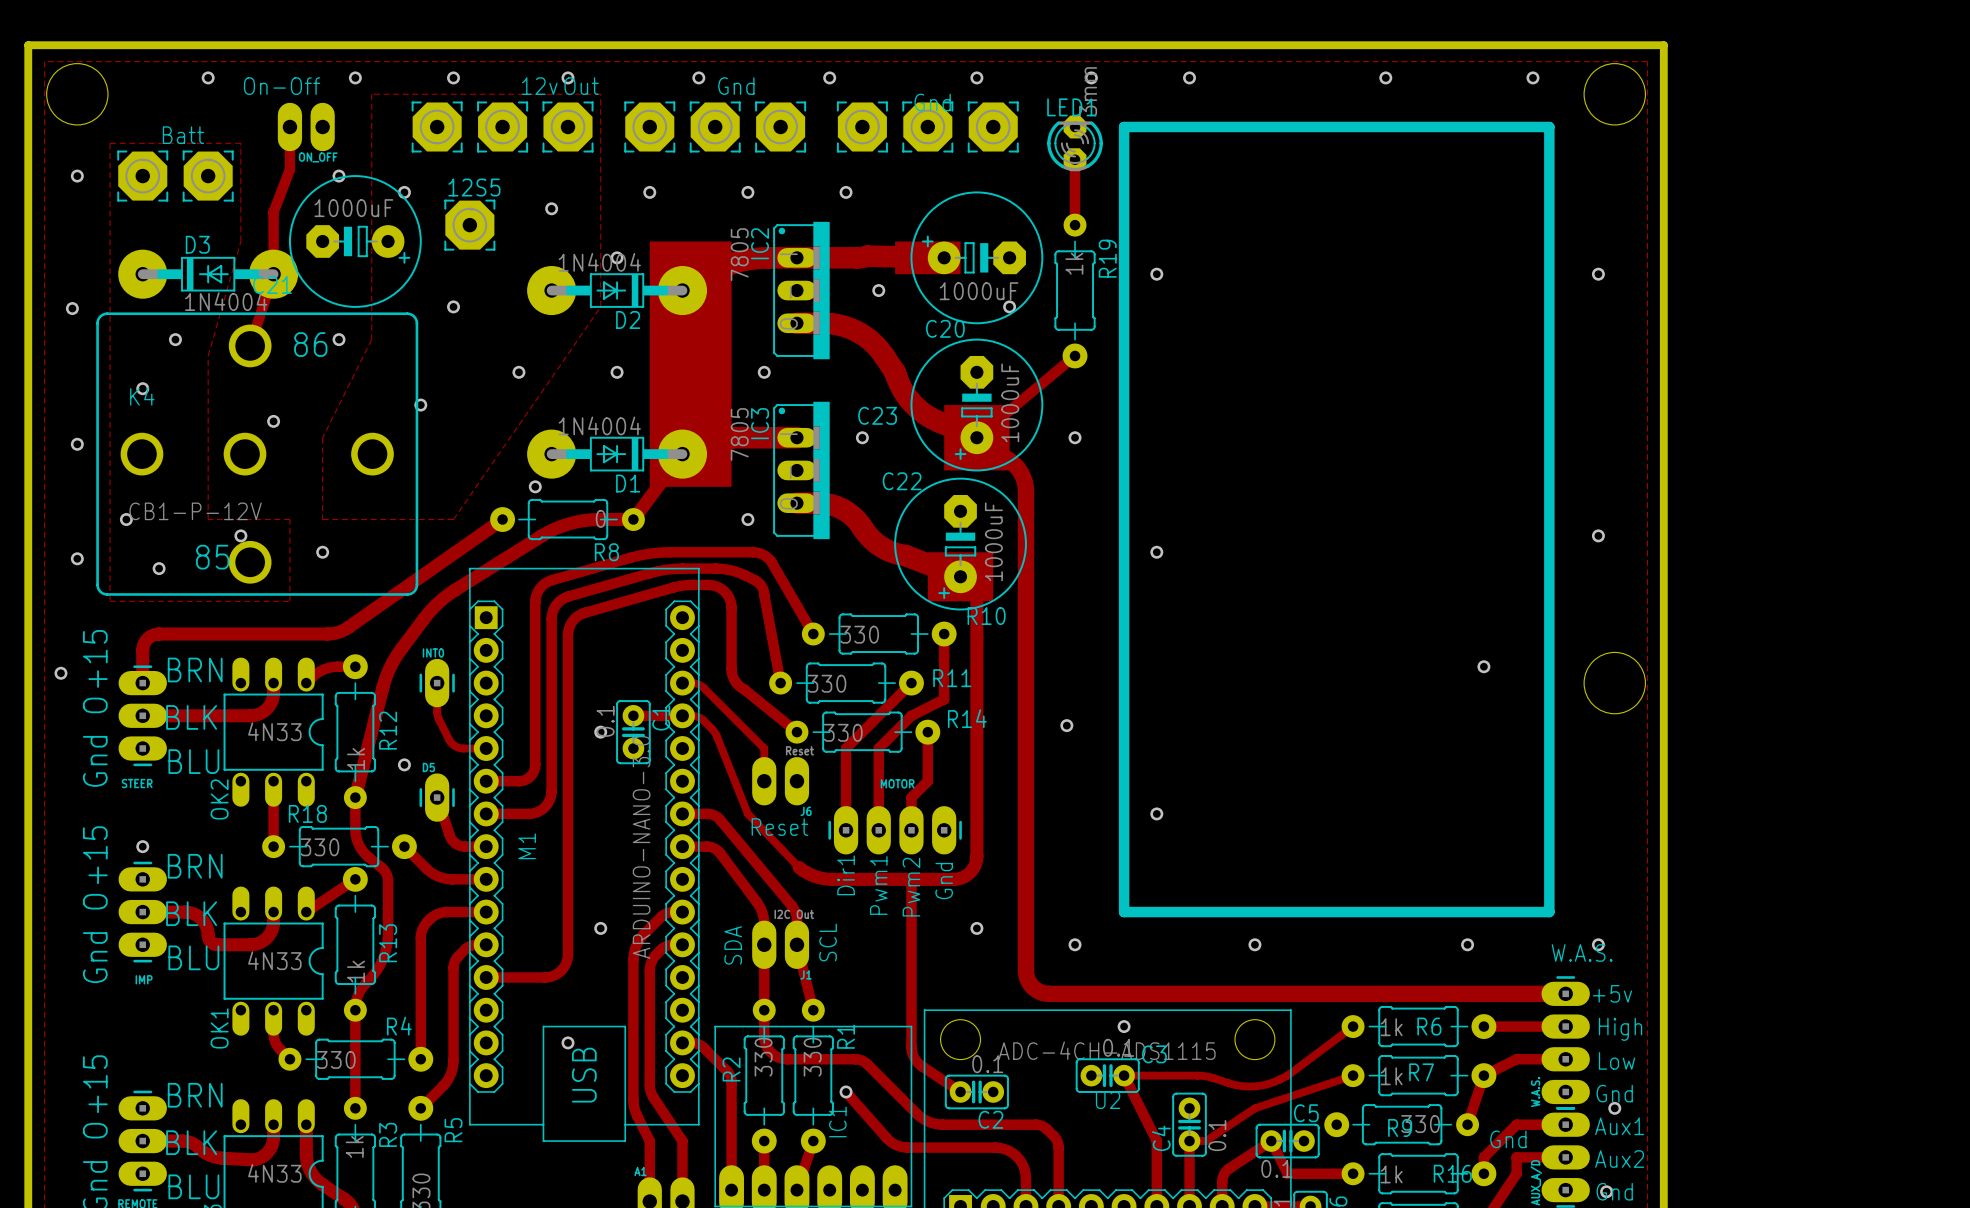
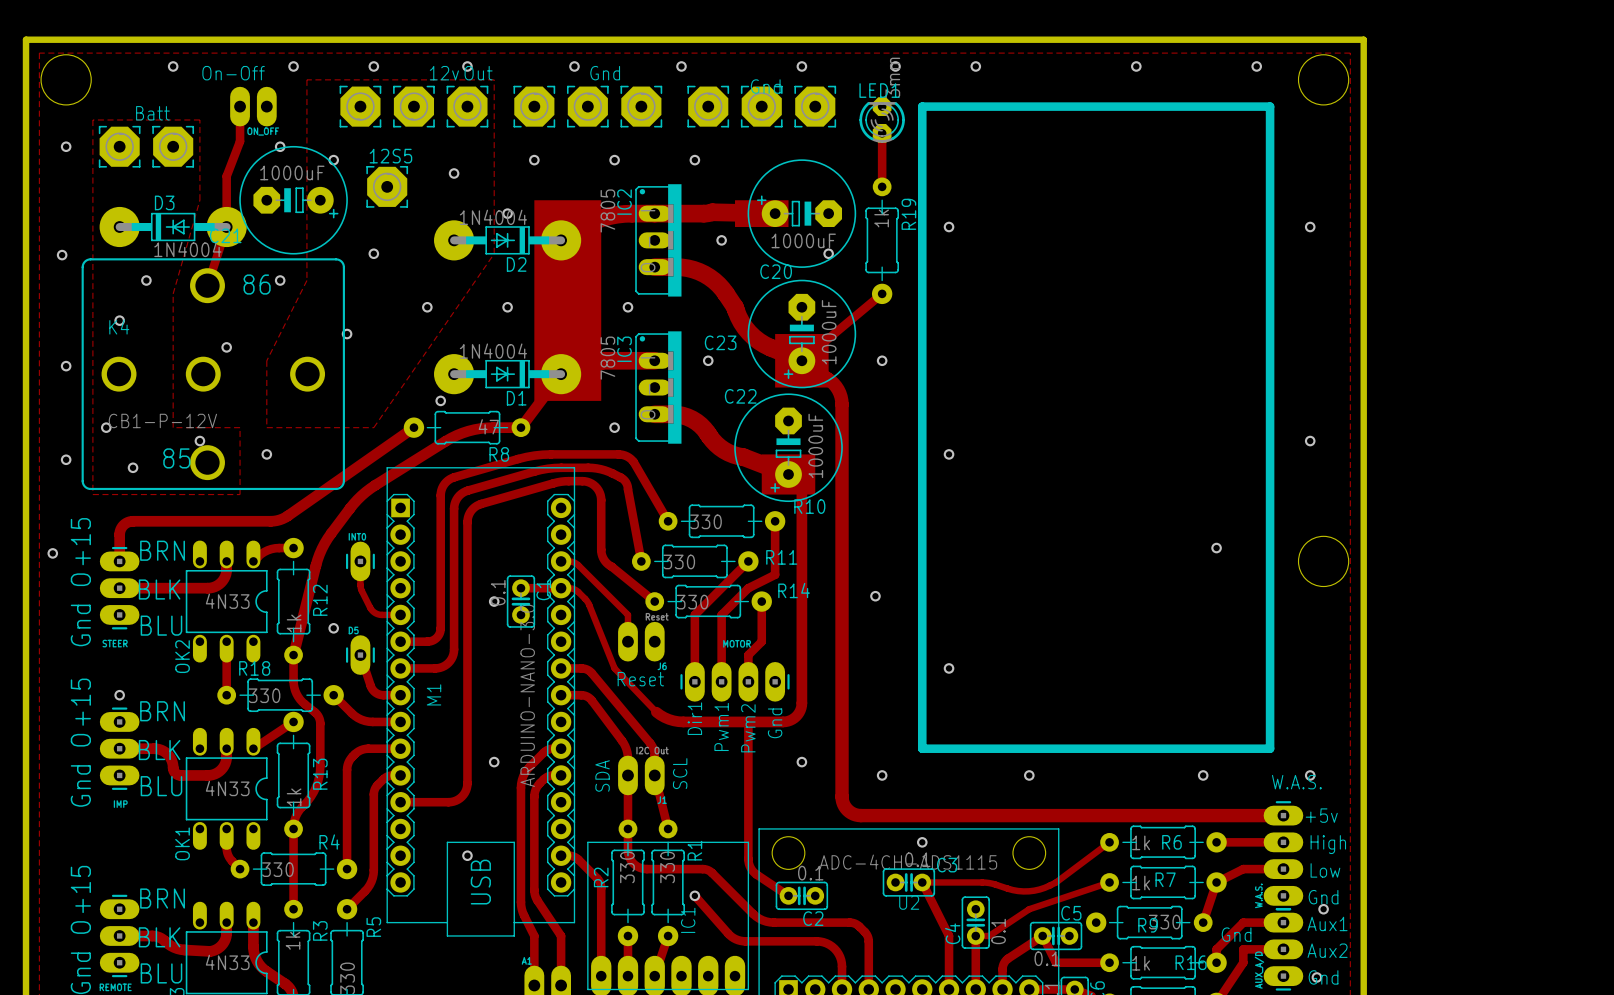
R8 value: 0 (600, 518) -> 47 (488, 426)

